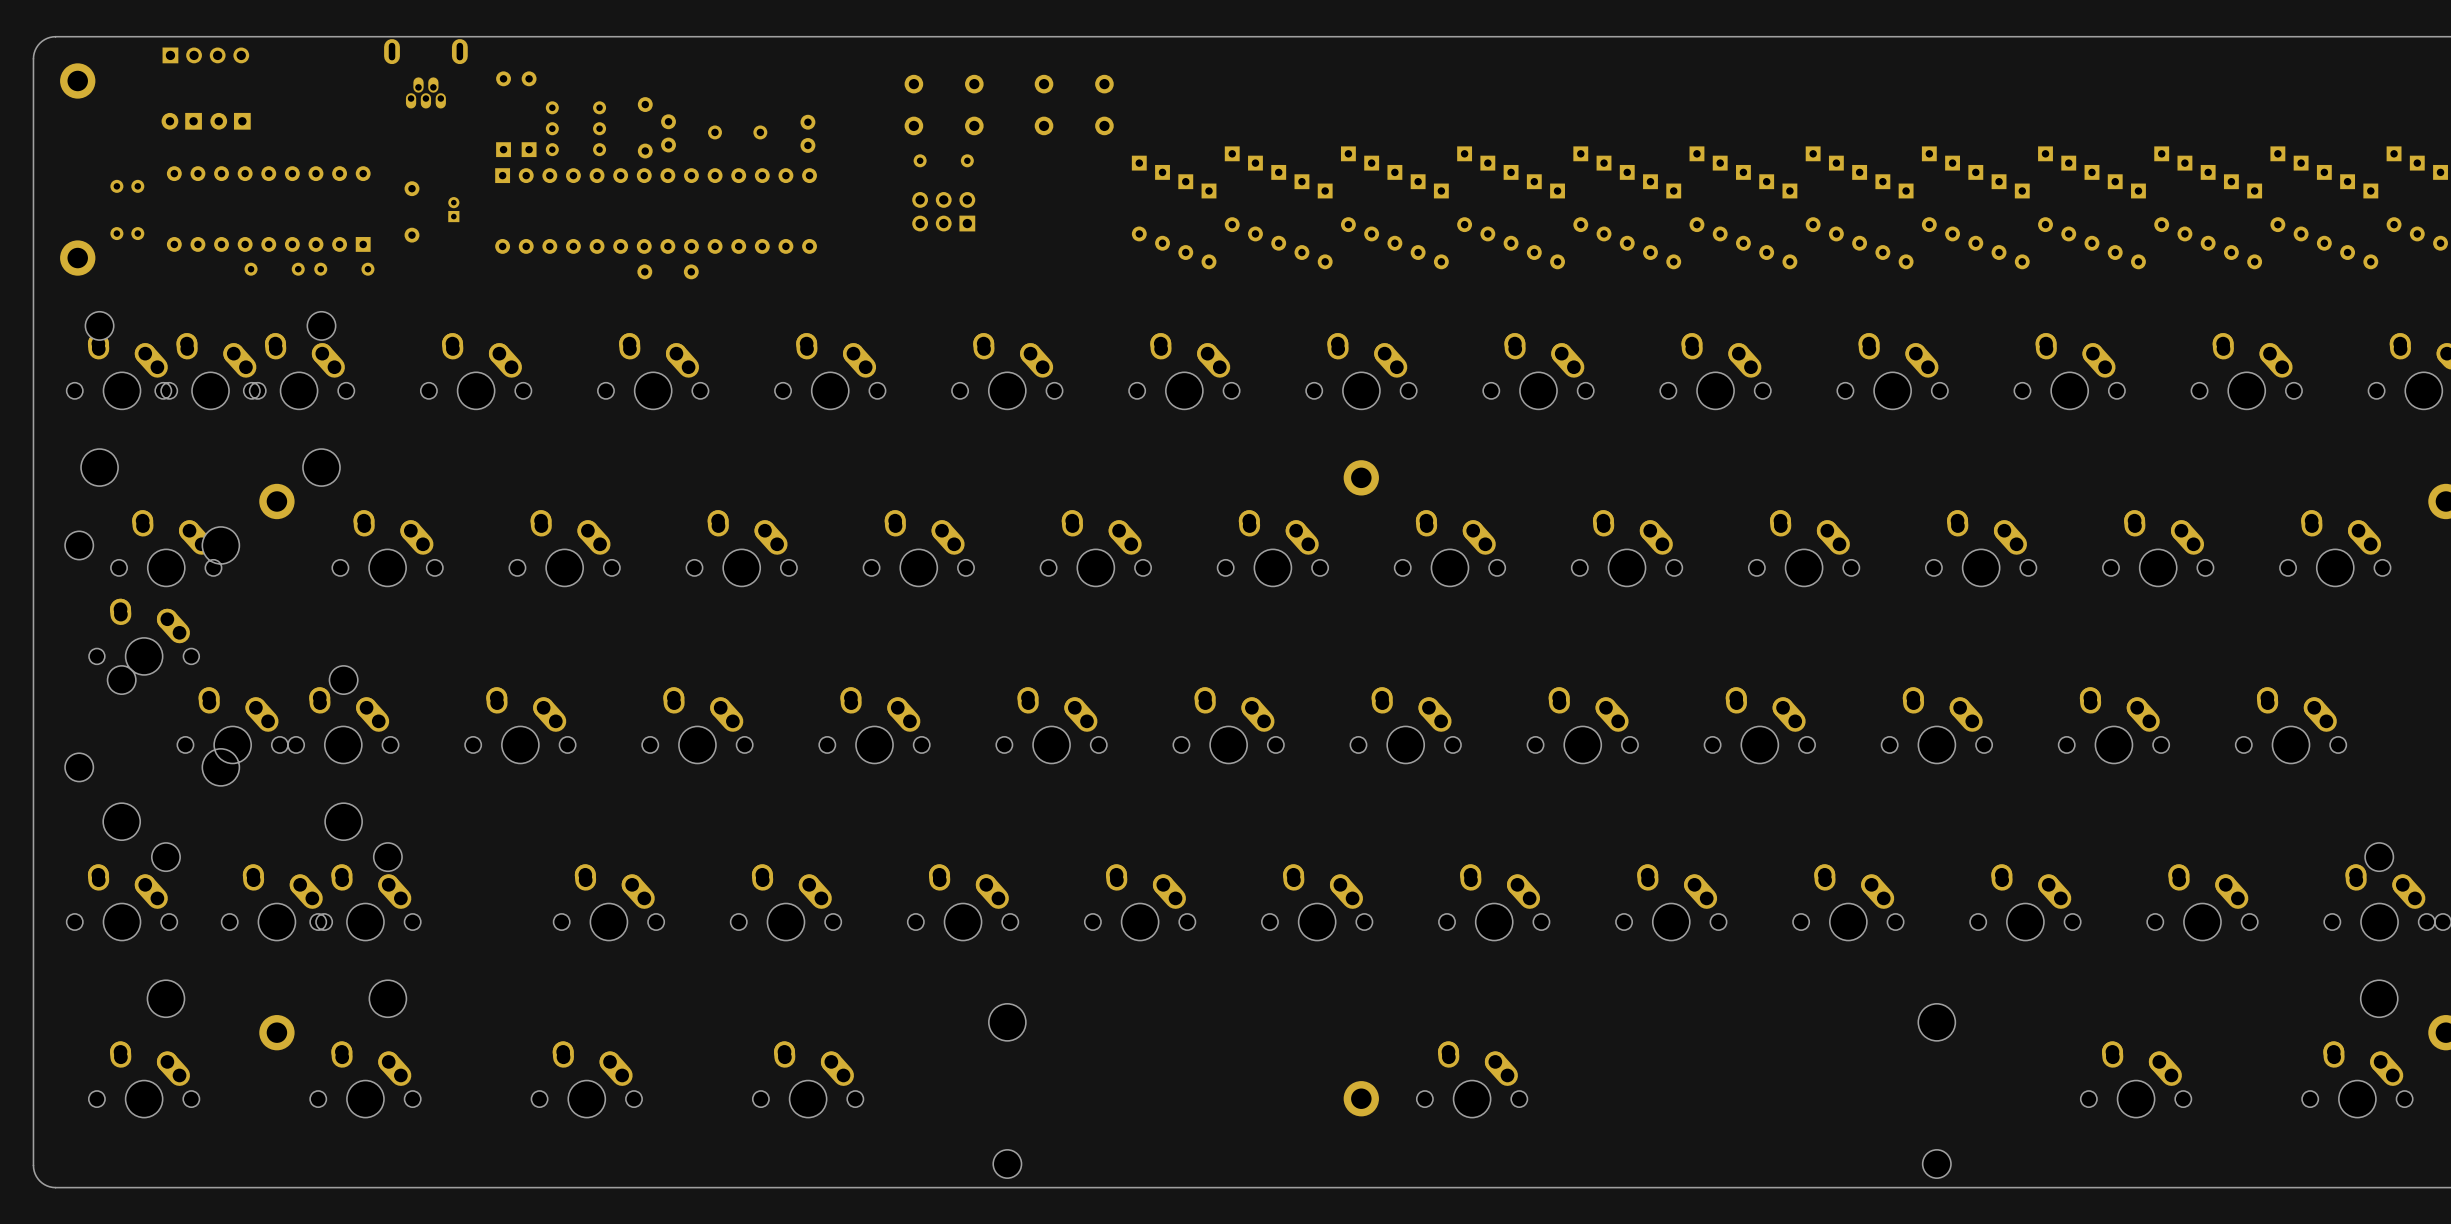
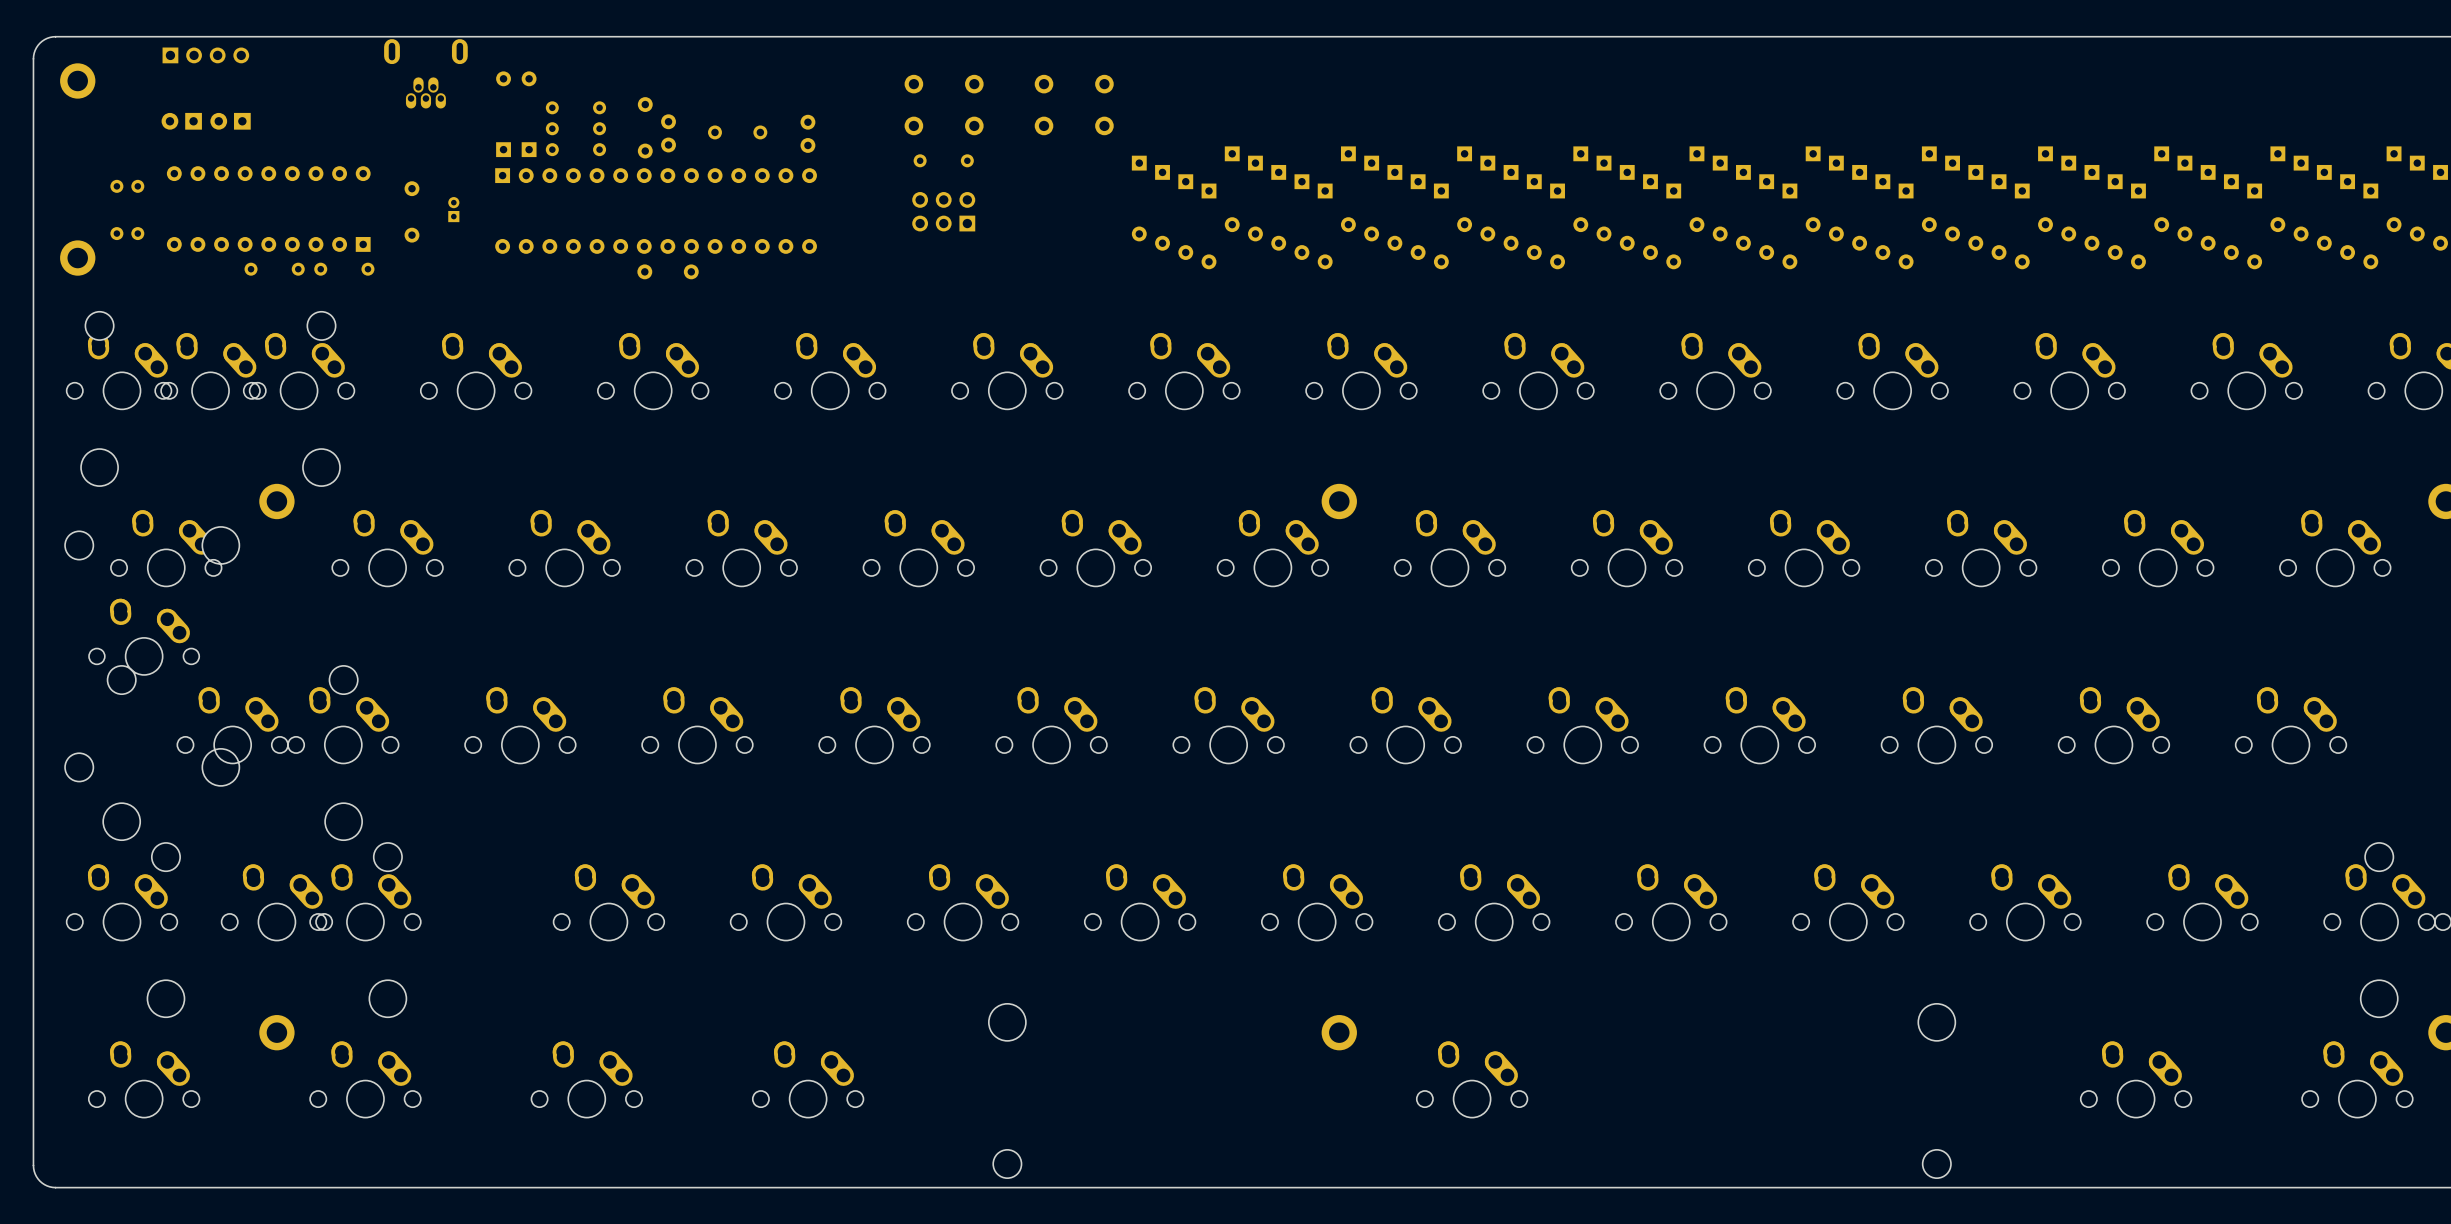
part position: (1361, 477) -> (1339, 501)
part position: (1361, 1098) -> (1339, 1032)

